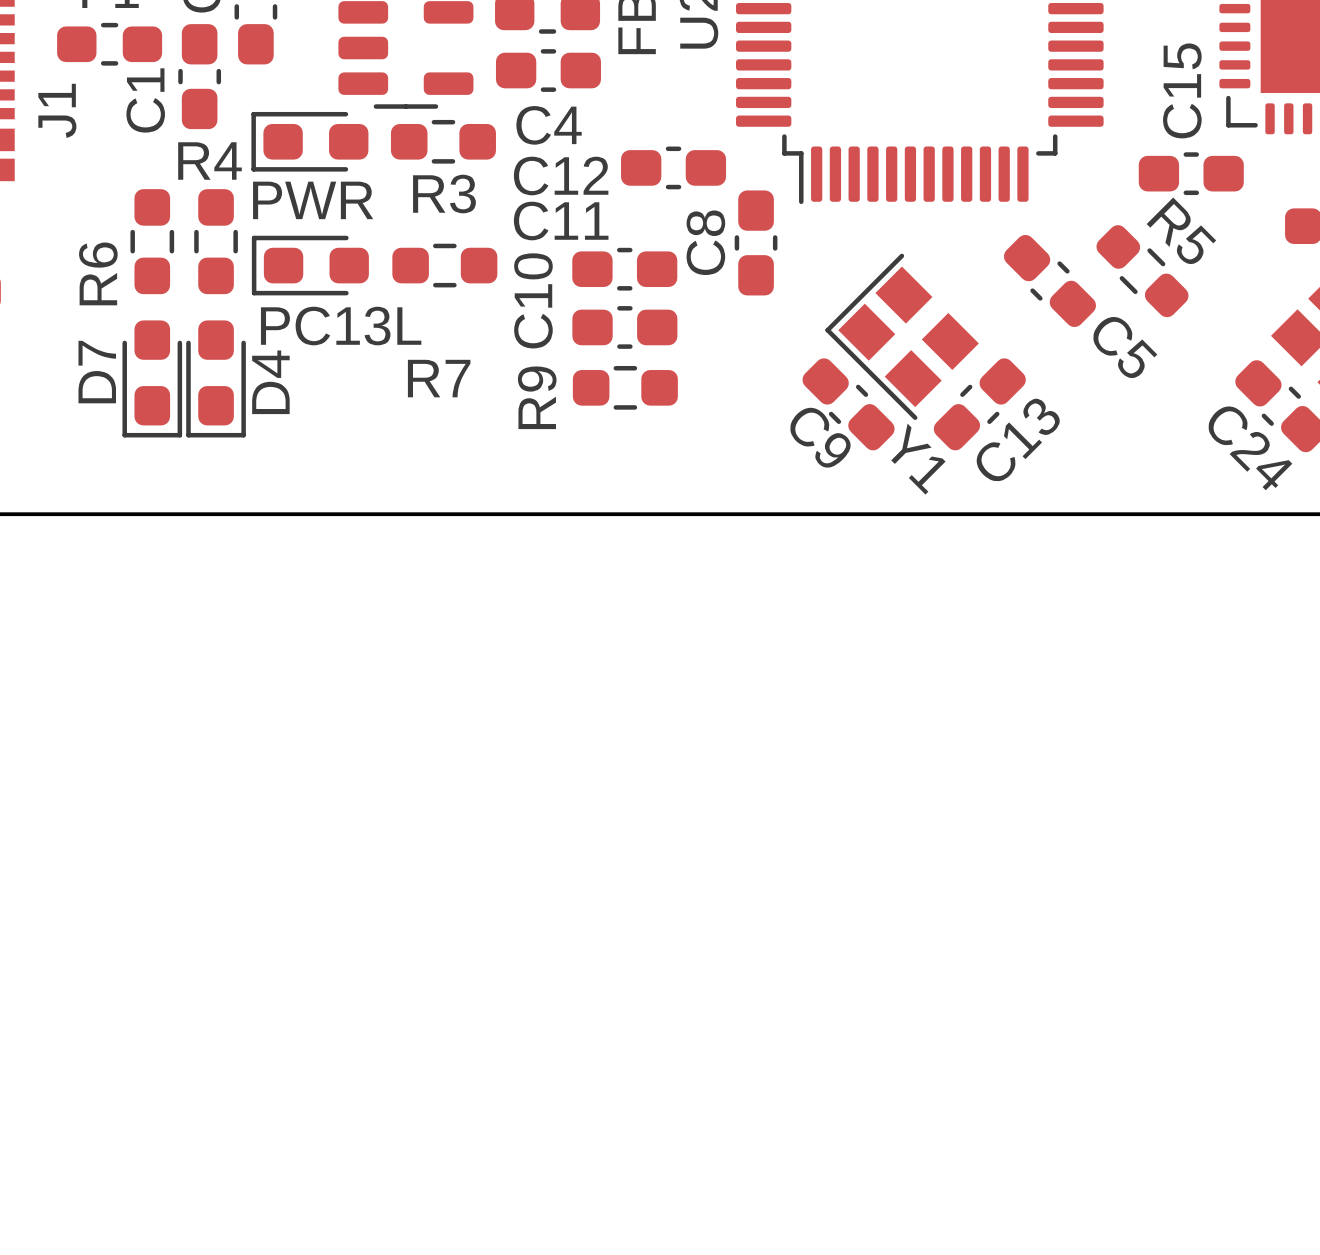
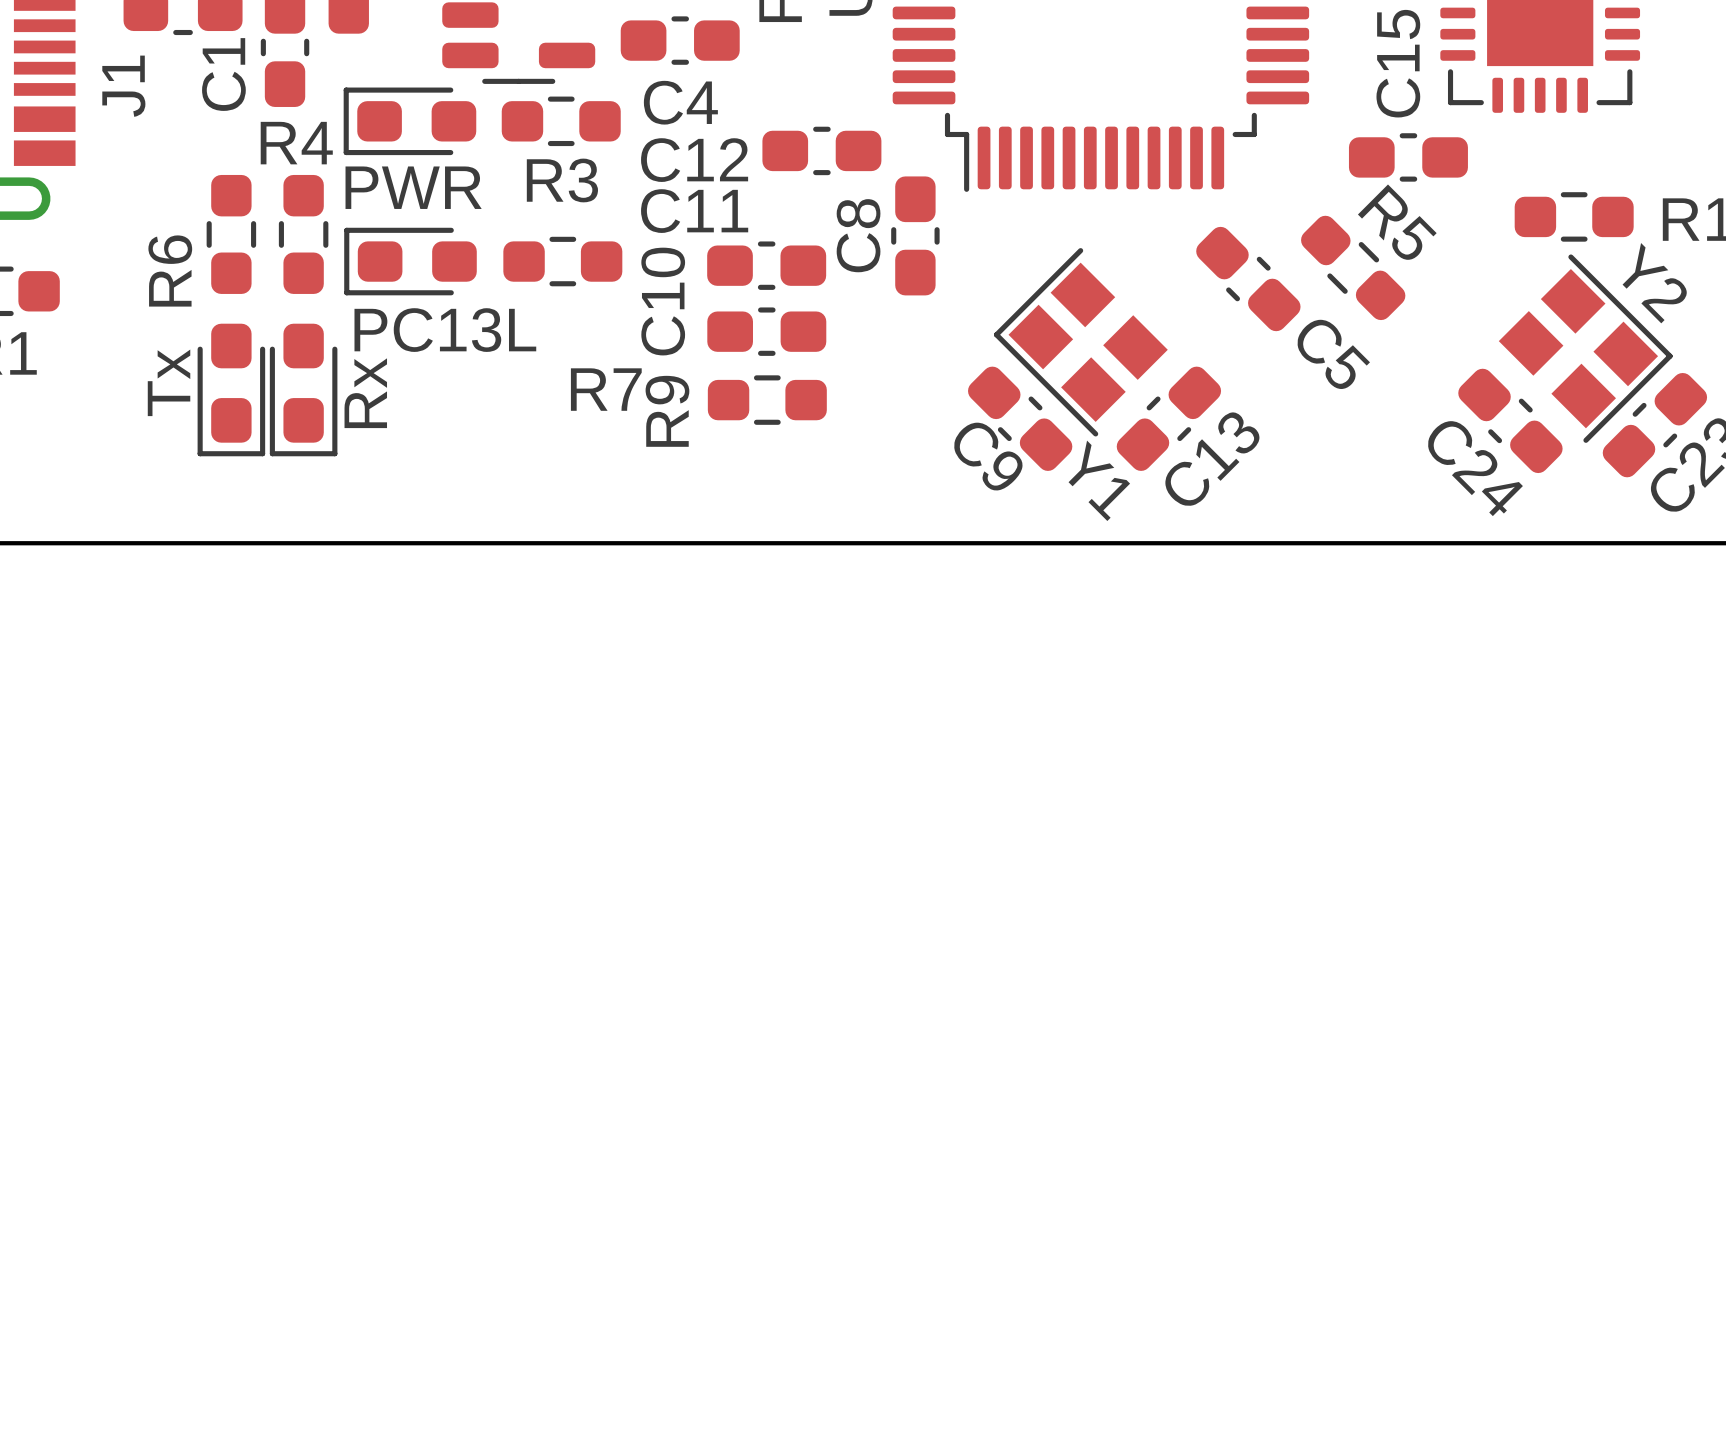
D7 name: D7 (97, 372) -> Tx (169, 382)
R7 name position: R7 (439, 378) -> R7 (606, 389)
D4 name: D4 (270, 382) -> Rx (365, 393)

